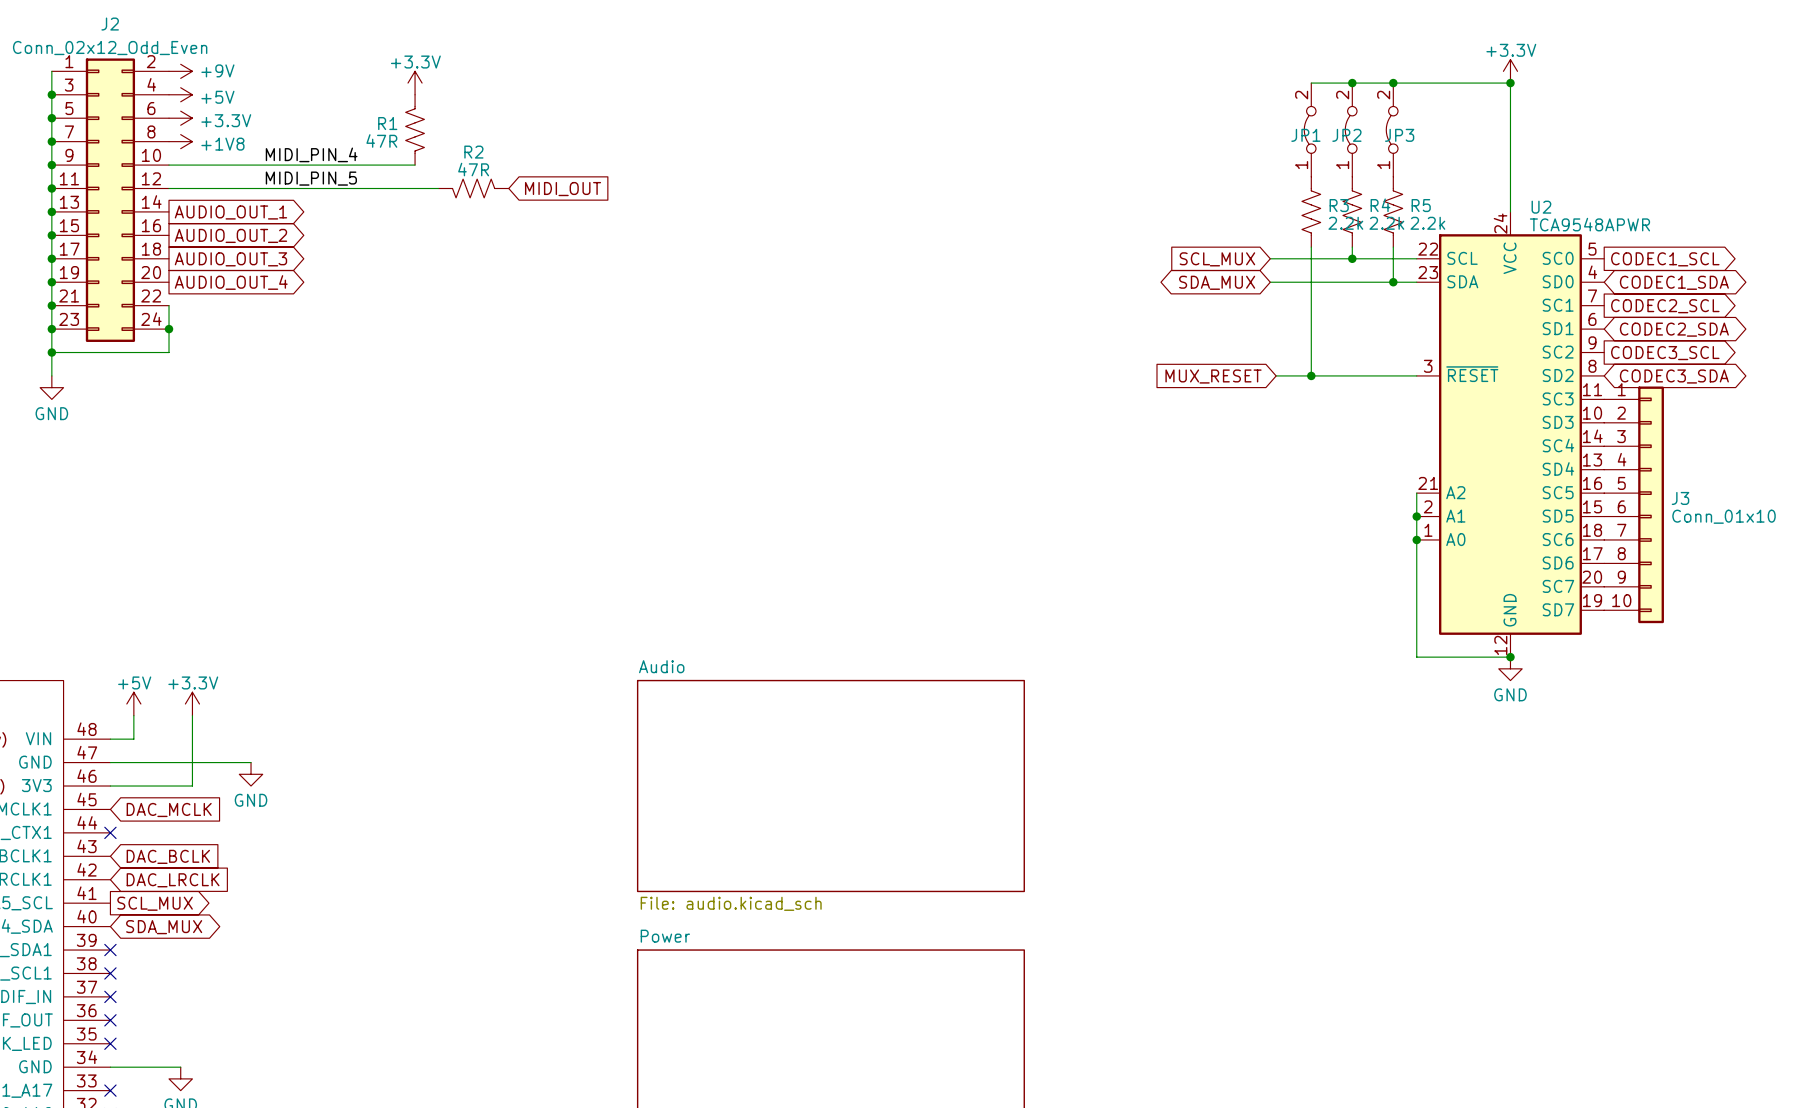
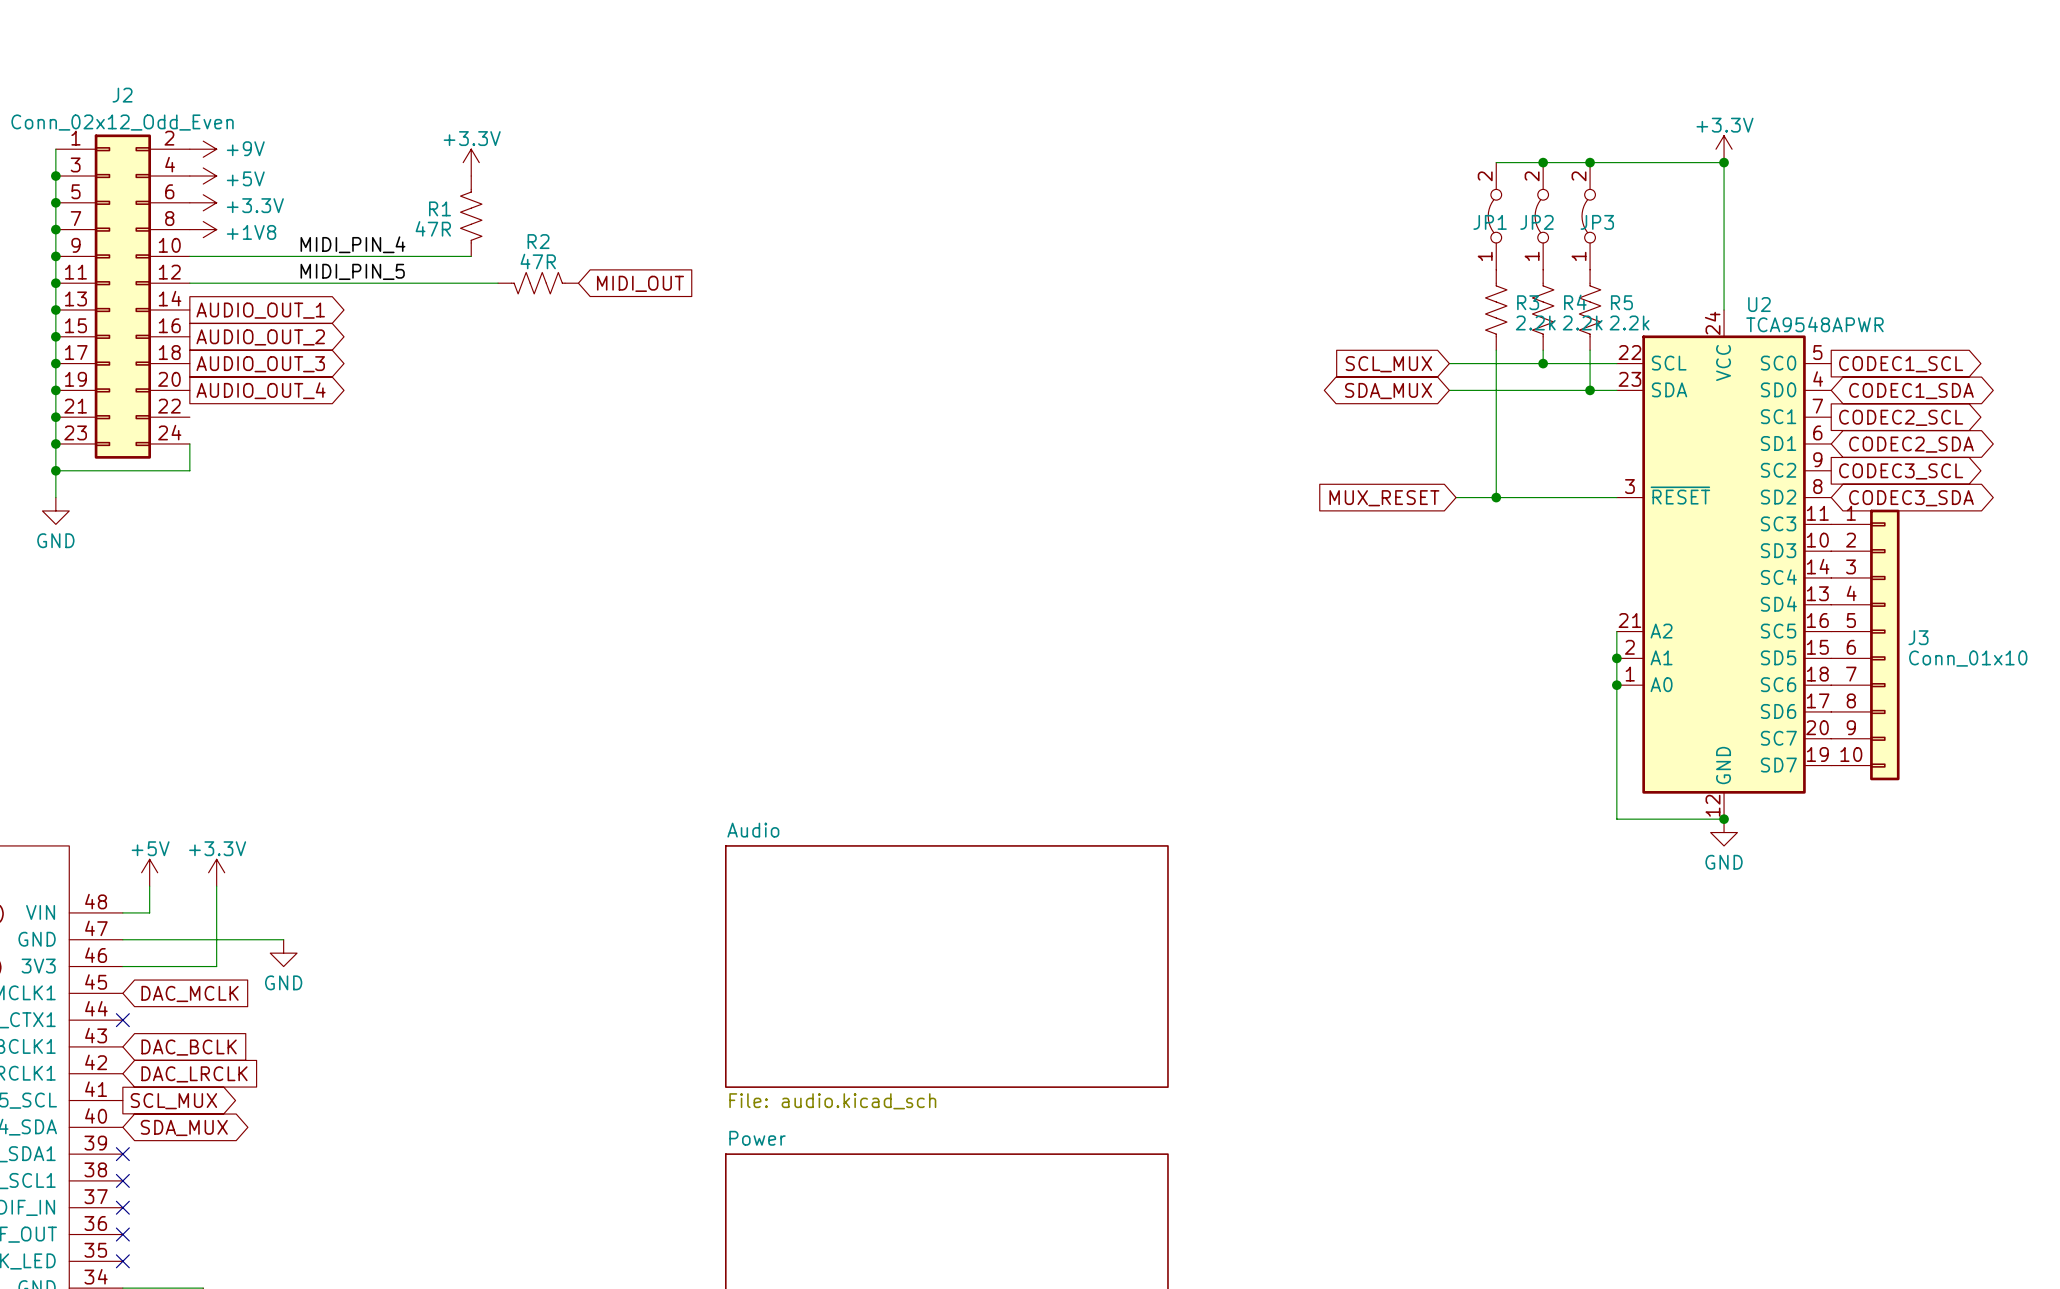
wire: (169, 305) (169, 329) -> none
junction: (169, 329) -> none

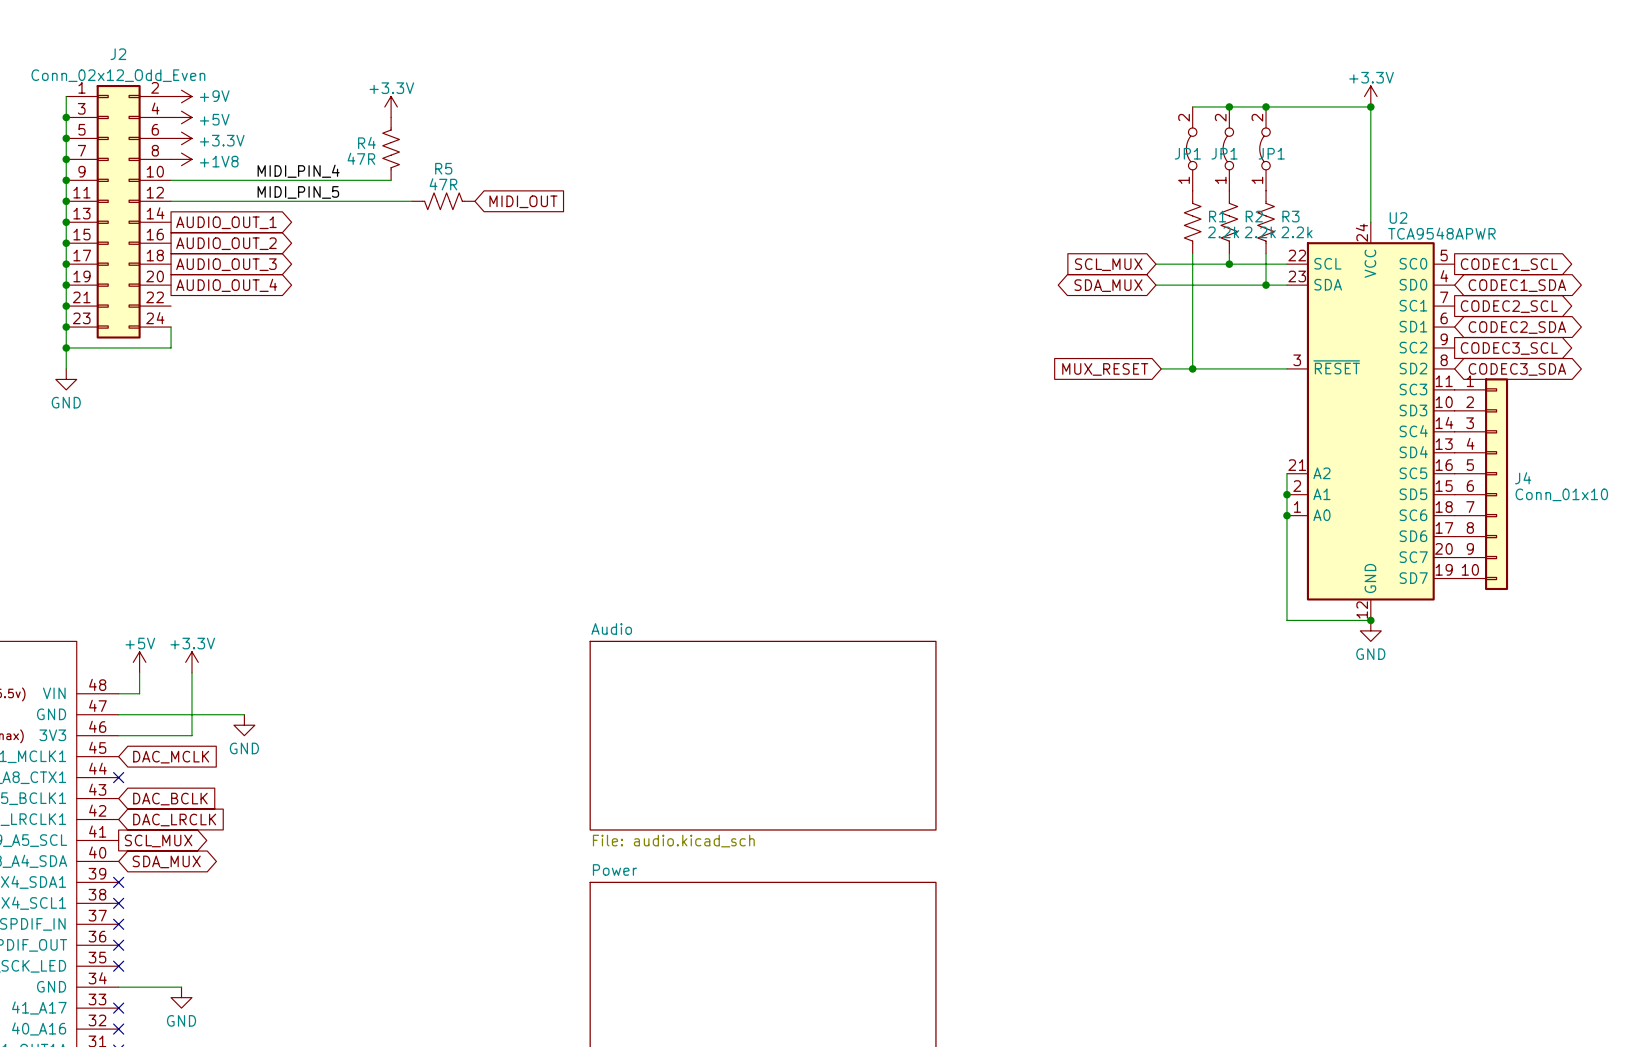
R1 name: R1 (440, 208) -> R4 (366, 142)
JP2 name: JP2 (1536, 222) -> JP1 (1224, 153)
JP3 name: JP3 (1597, 222) -> JP1 (1271, 153)
R2 name: R2 (538, 241) -> R5 (443, 168)
R3 name: R3 (1528, 302) -> R1 (1217, 216)
R4 name: R4 (1575, 302) -> R2 (1254, 216)
R5 name: R5 (1621, 302) -> R3 (1290, 216)
J3 name: J3 (1918, 637) -> J4 (1523, 478)

